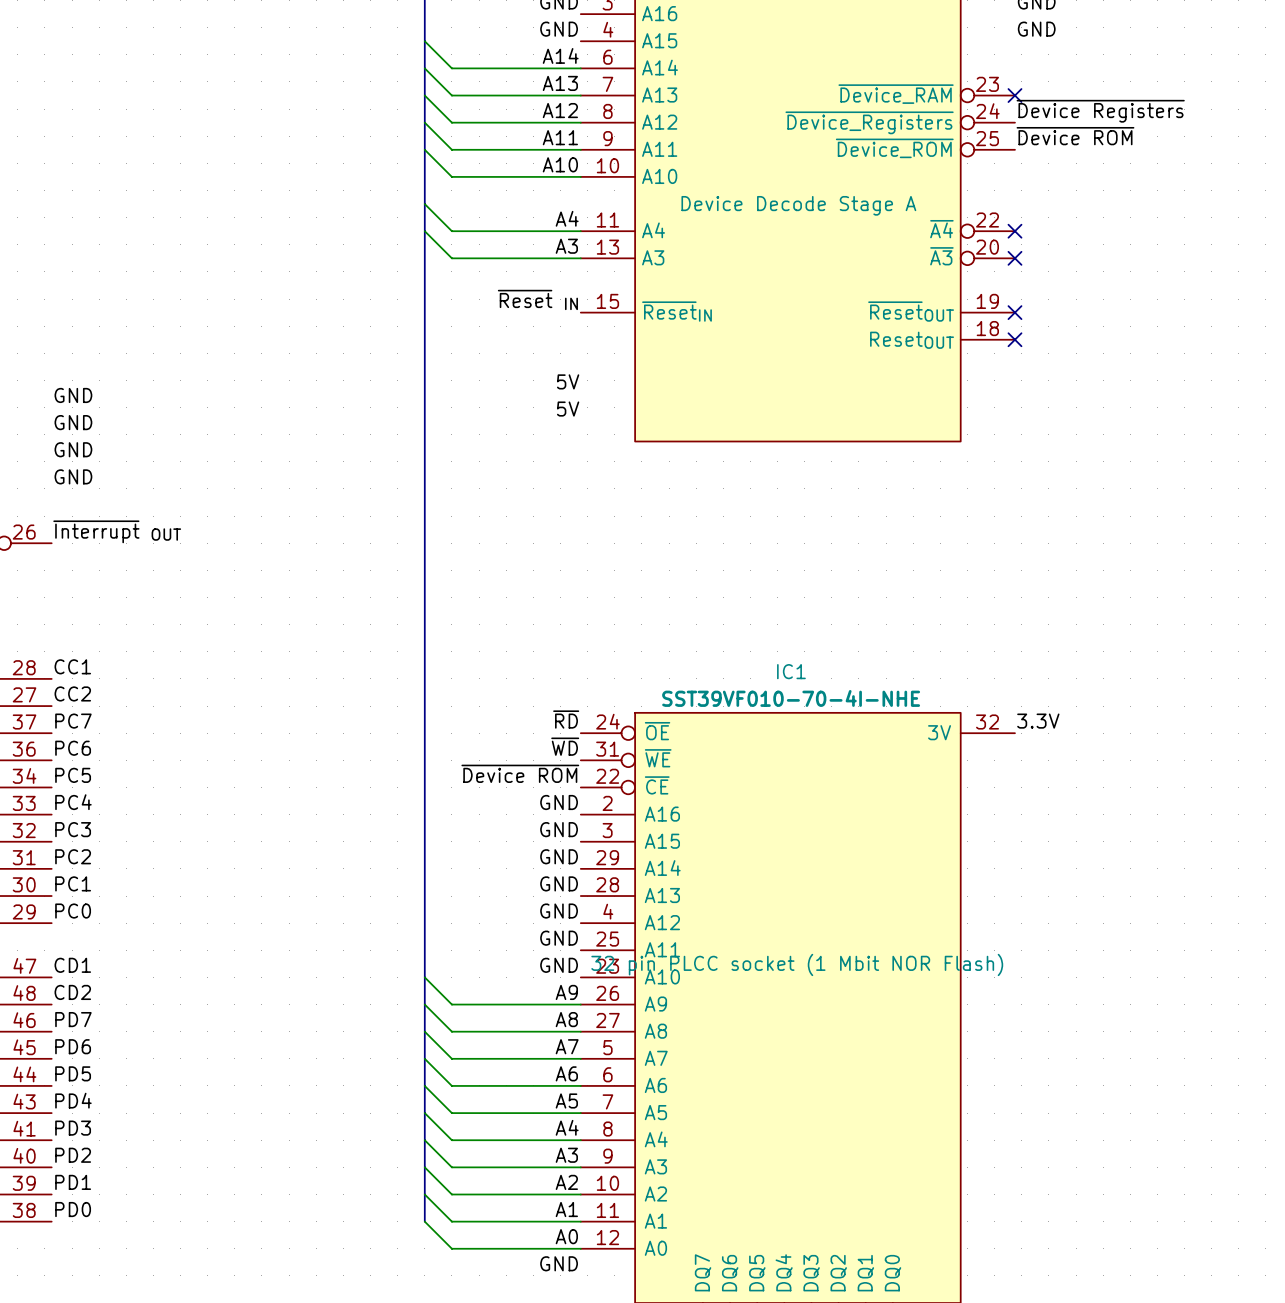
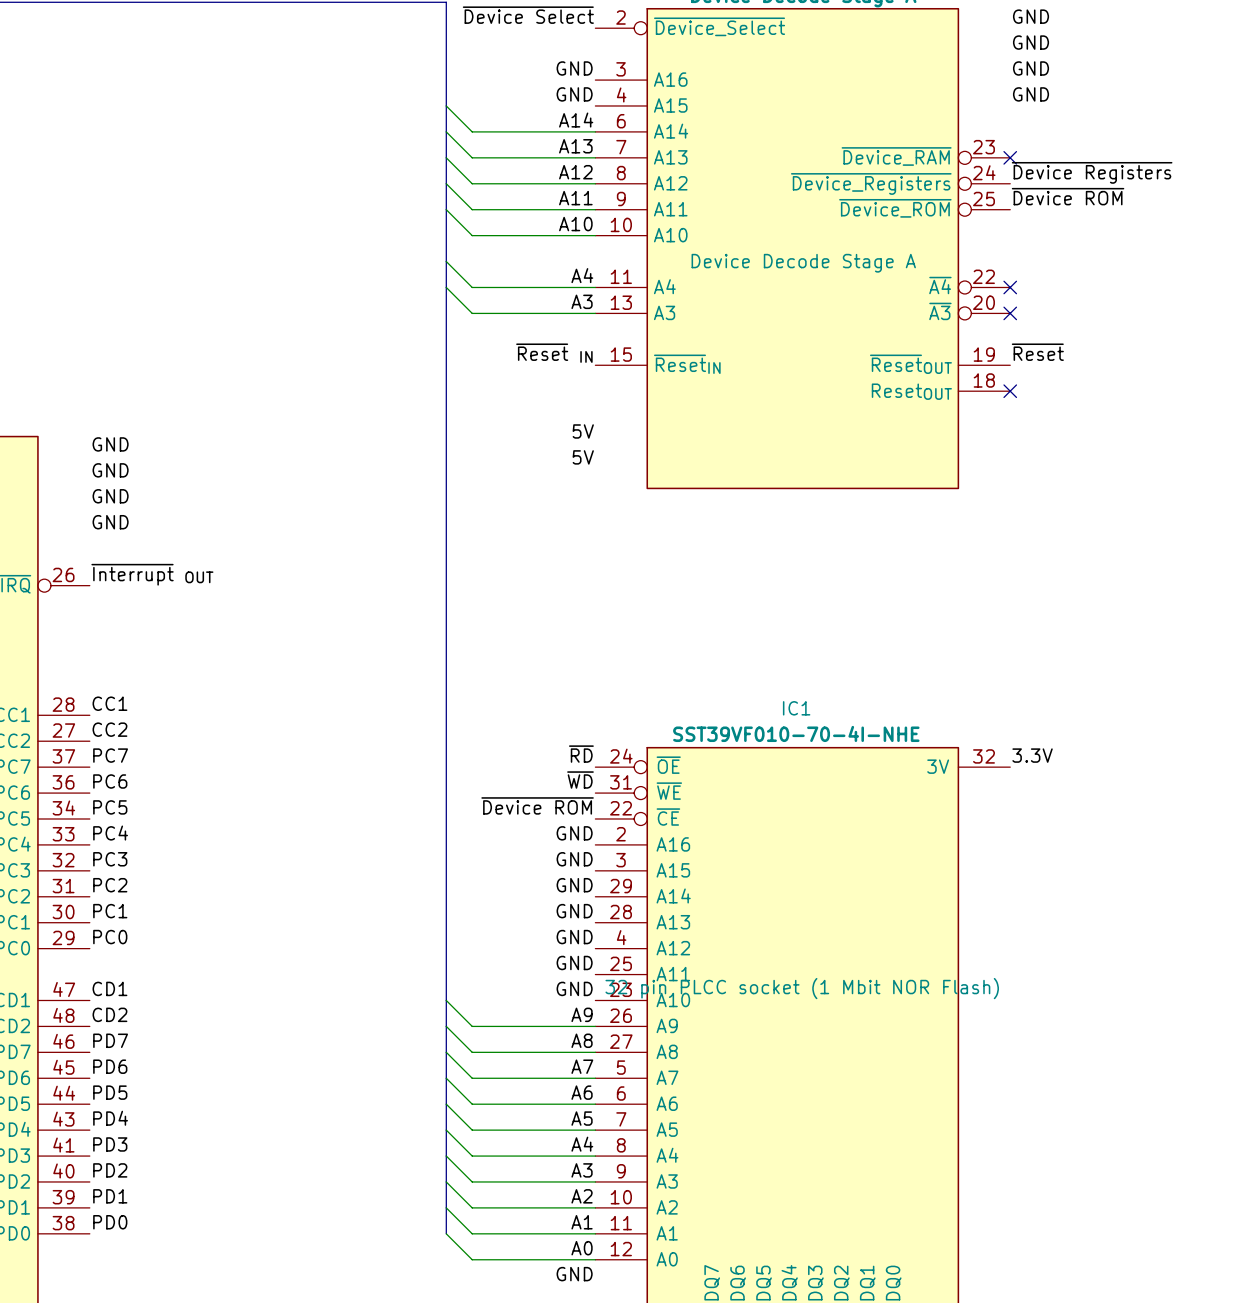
label: none -> ~{Reset} (1037, 352)
no-connect mark: (1014, 312) -> none

